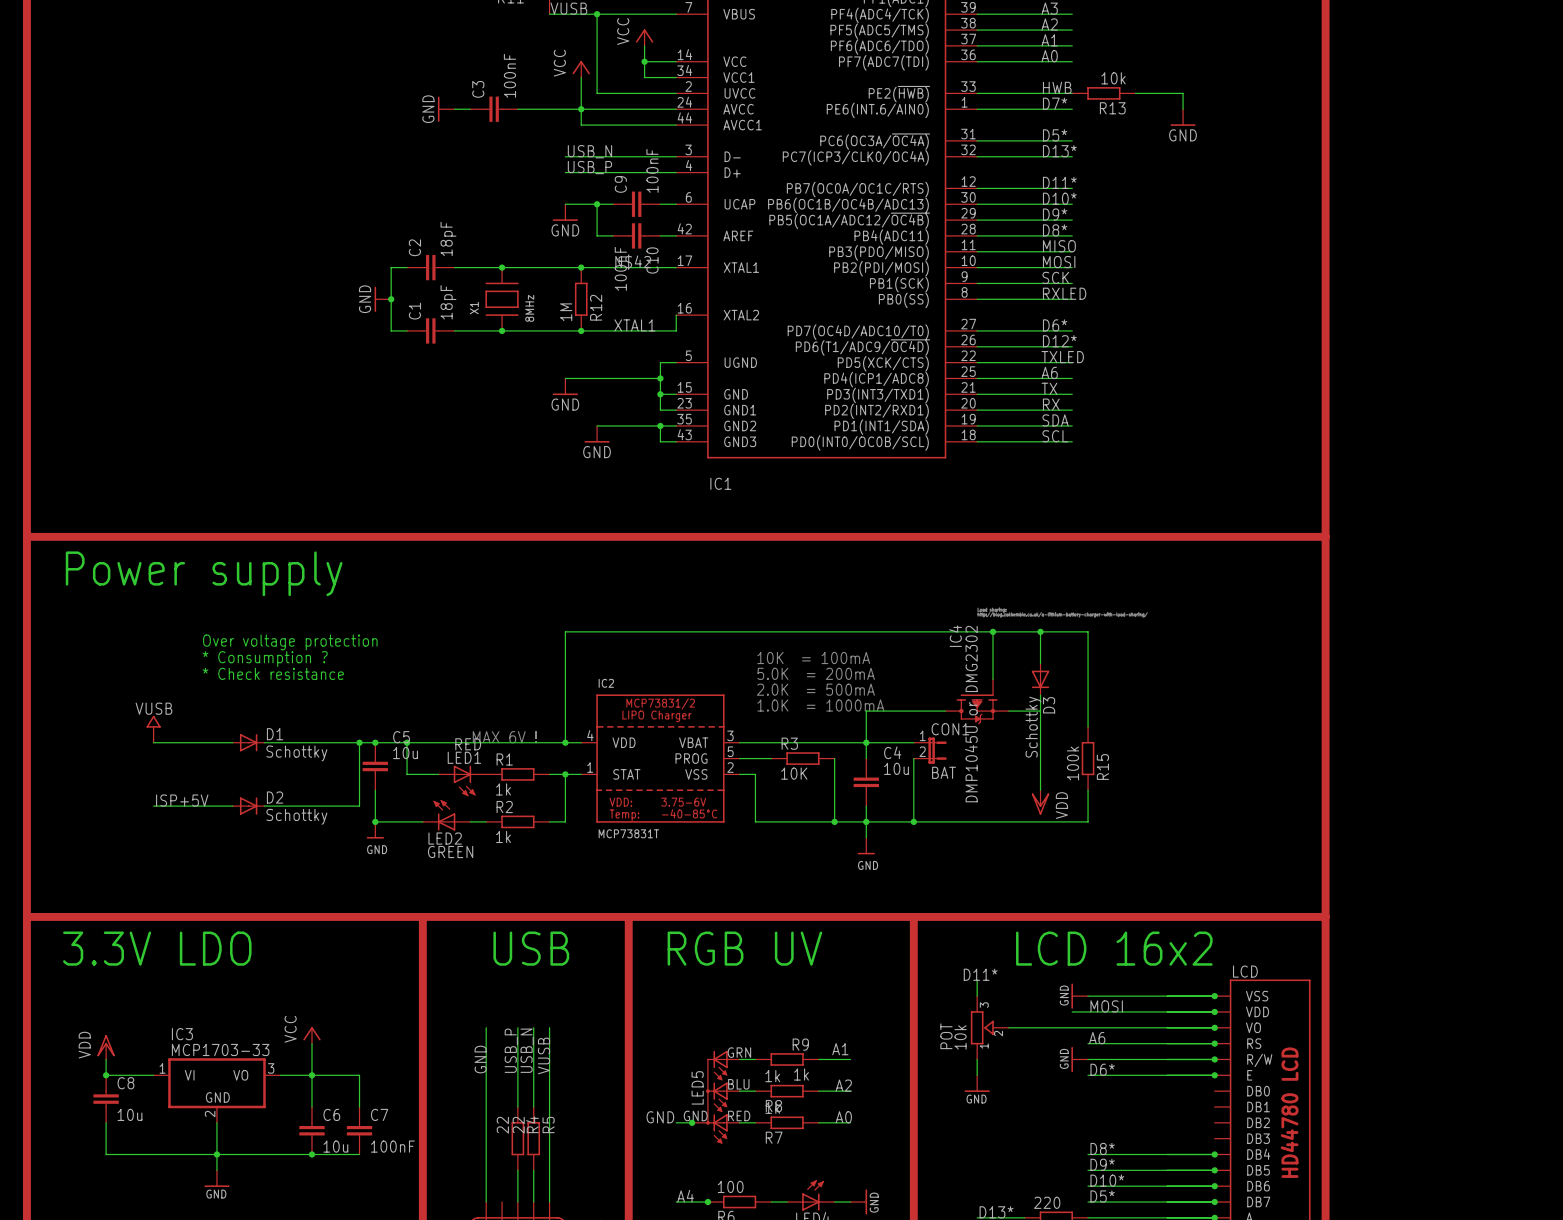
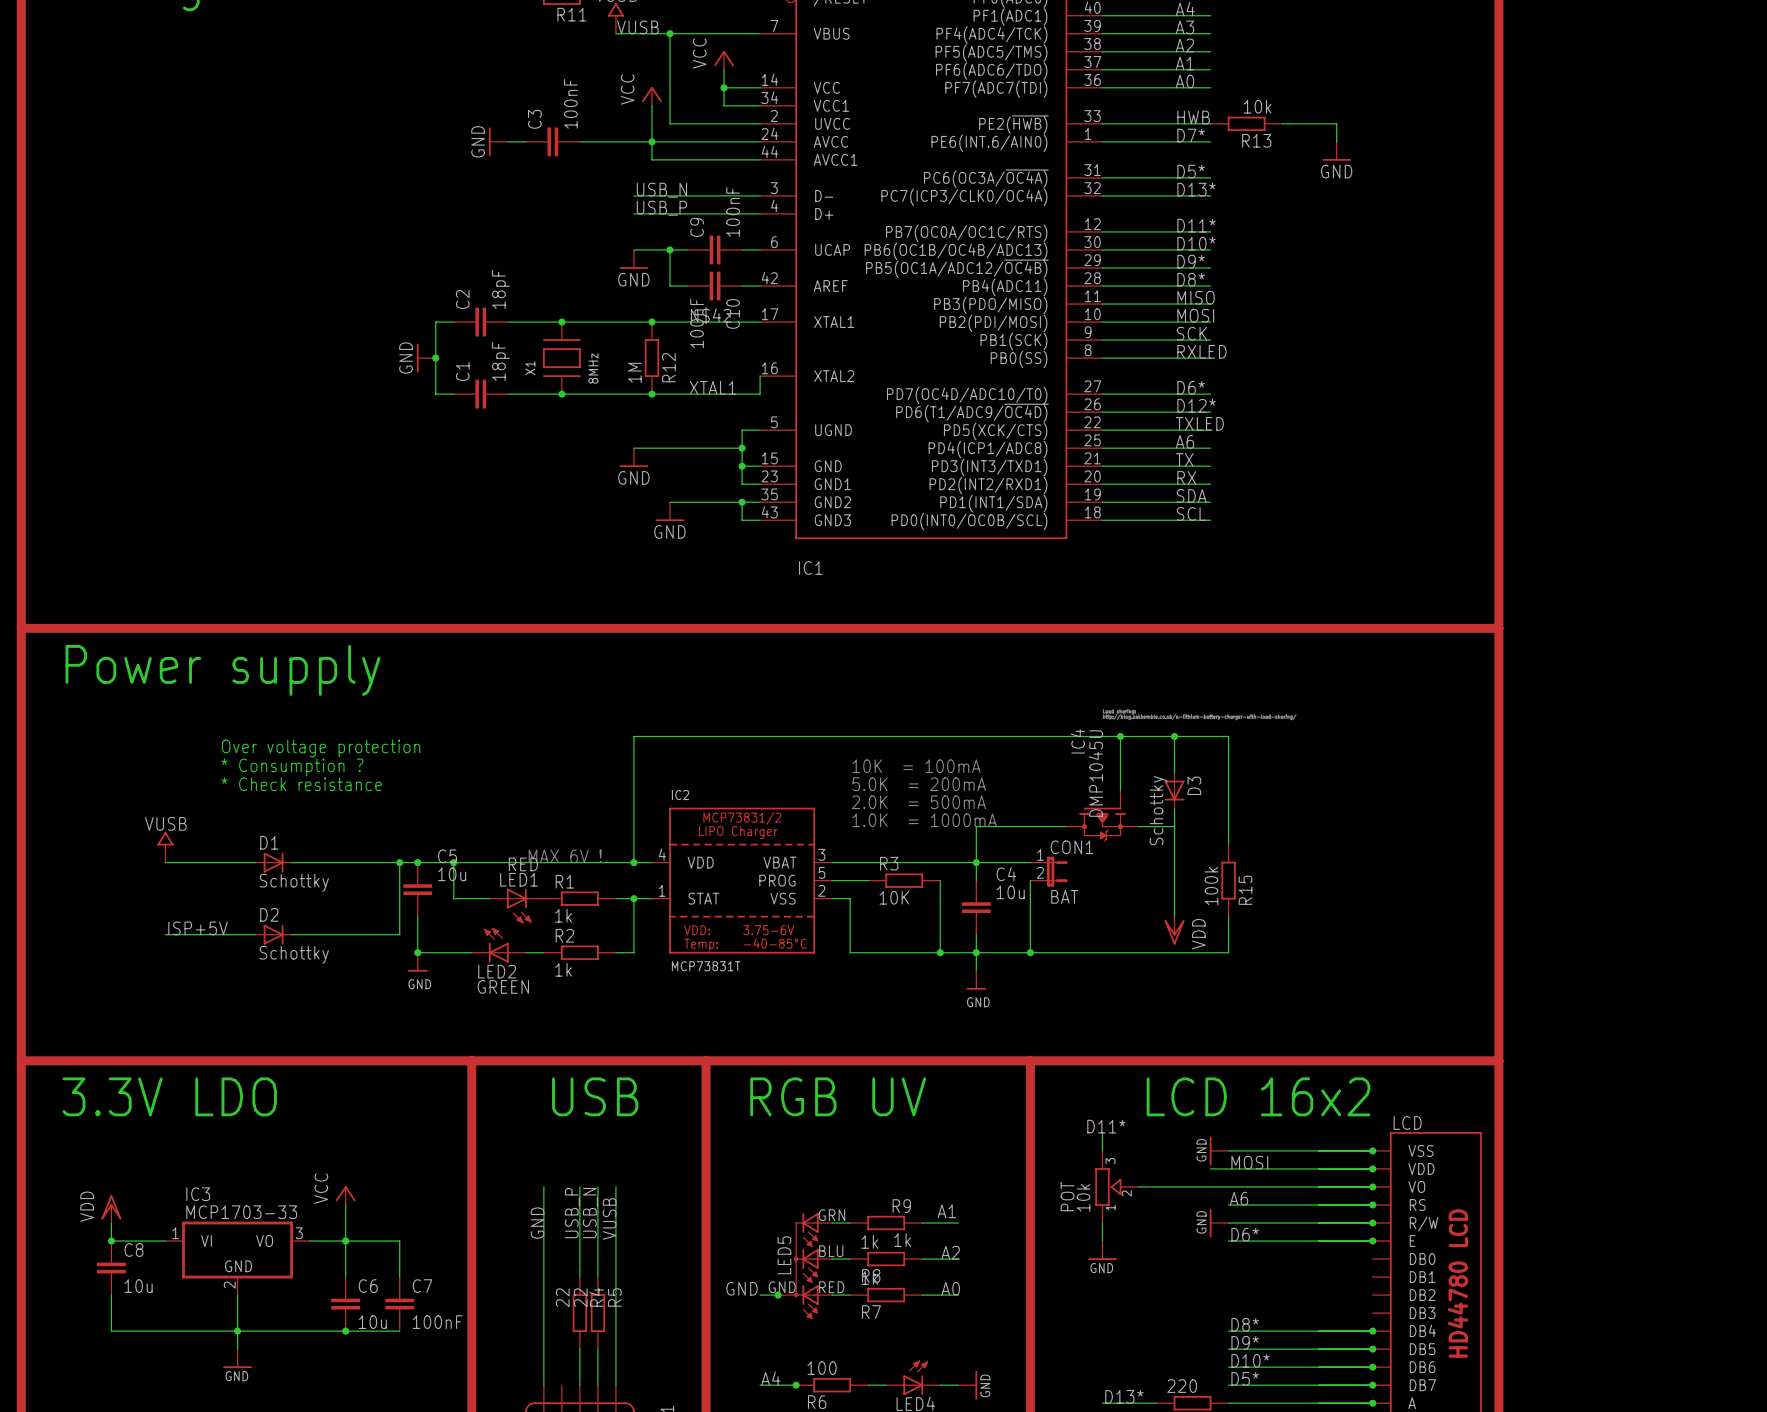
D3 name position: D3 (1049, 705) -> D3 (1194, 785)
IC4 value: DMP1045U or DMG2302 (971, 714) -> DMP1045U (1095, 773)
D3 value position: Schottky (1033, 727) -> Schottky (1158, 810)
D1 name position: D1 (275, 734) -> D1 (269, 842)
D1 value position: Schottky (296, 753) -> Schottky (294, 882)
D2 name position: D2 (275, 797) -> D2 (269, 914)
D2 value position: Schottky (296, 816) -> Schottky (294, 954)

